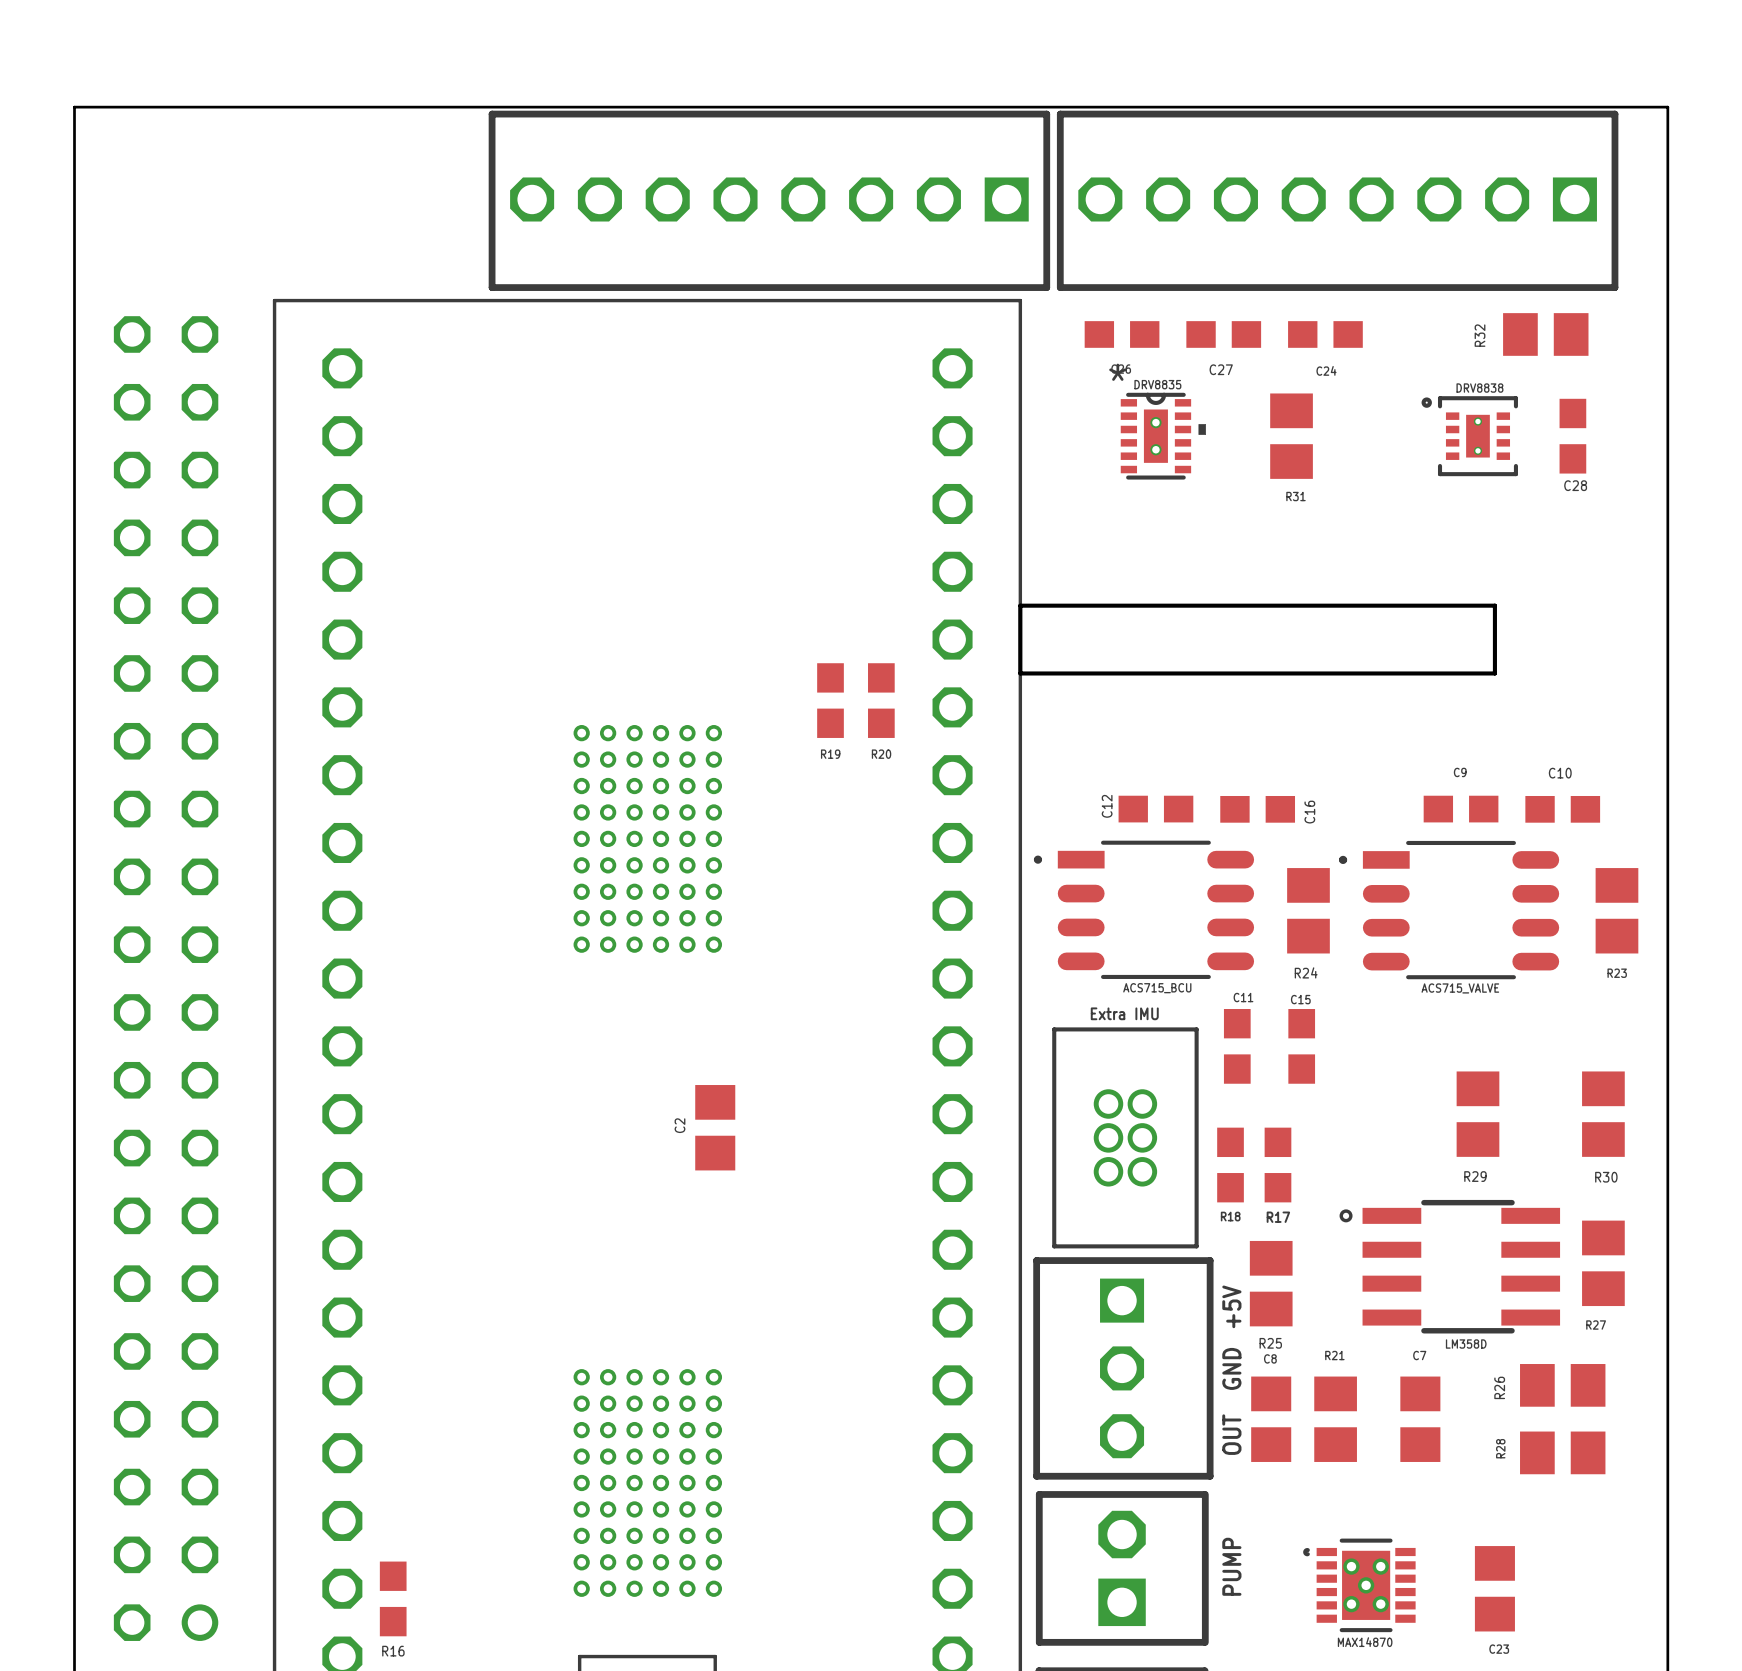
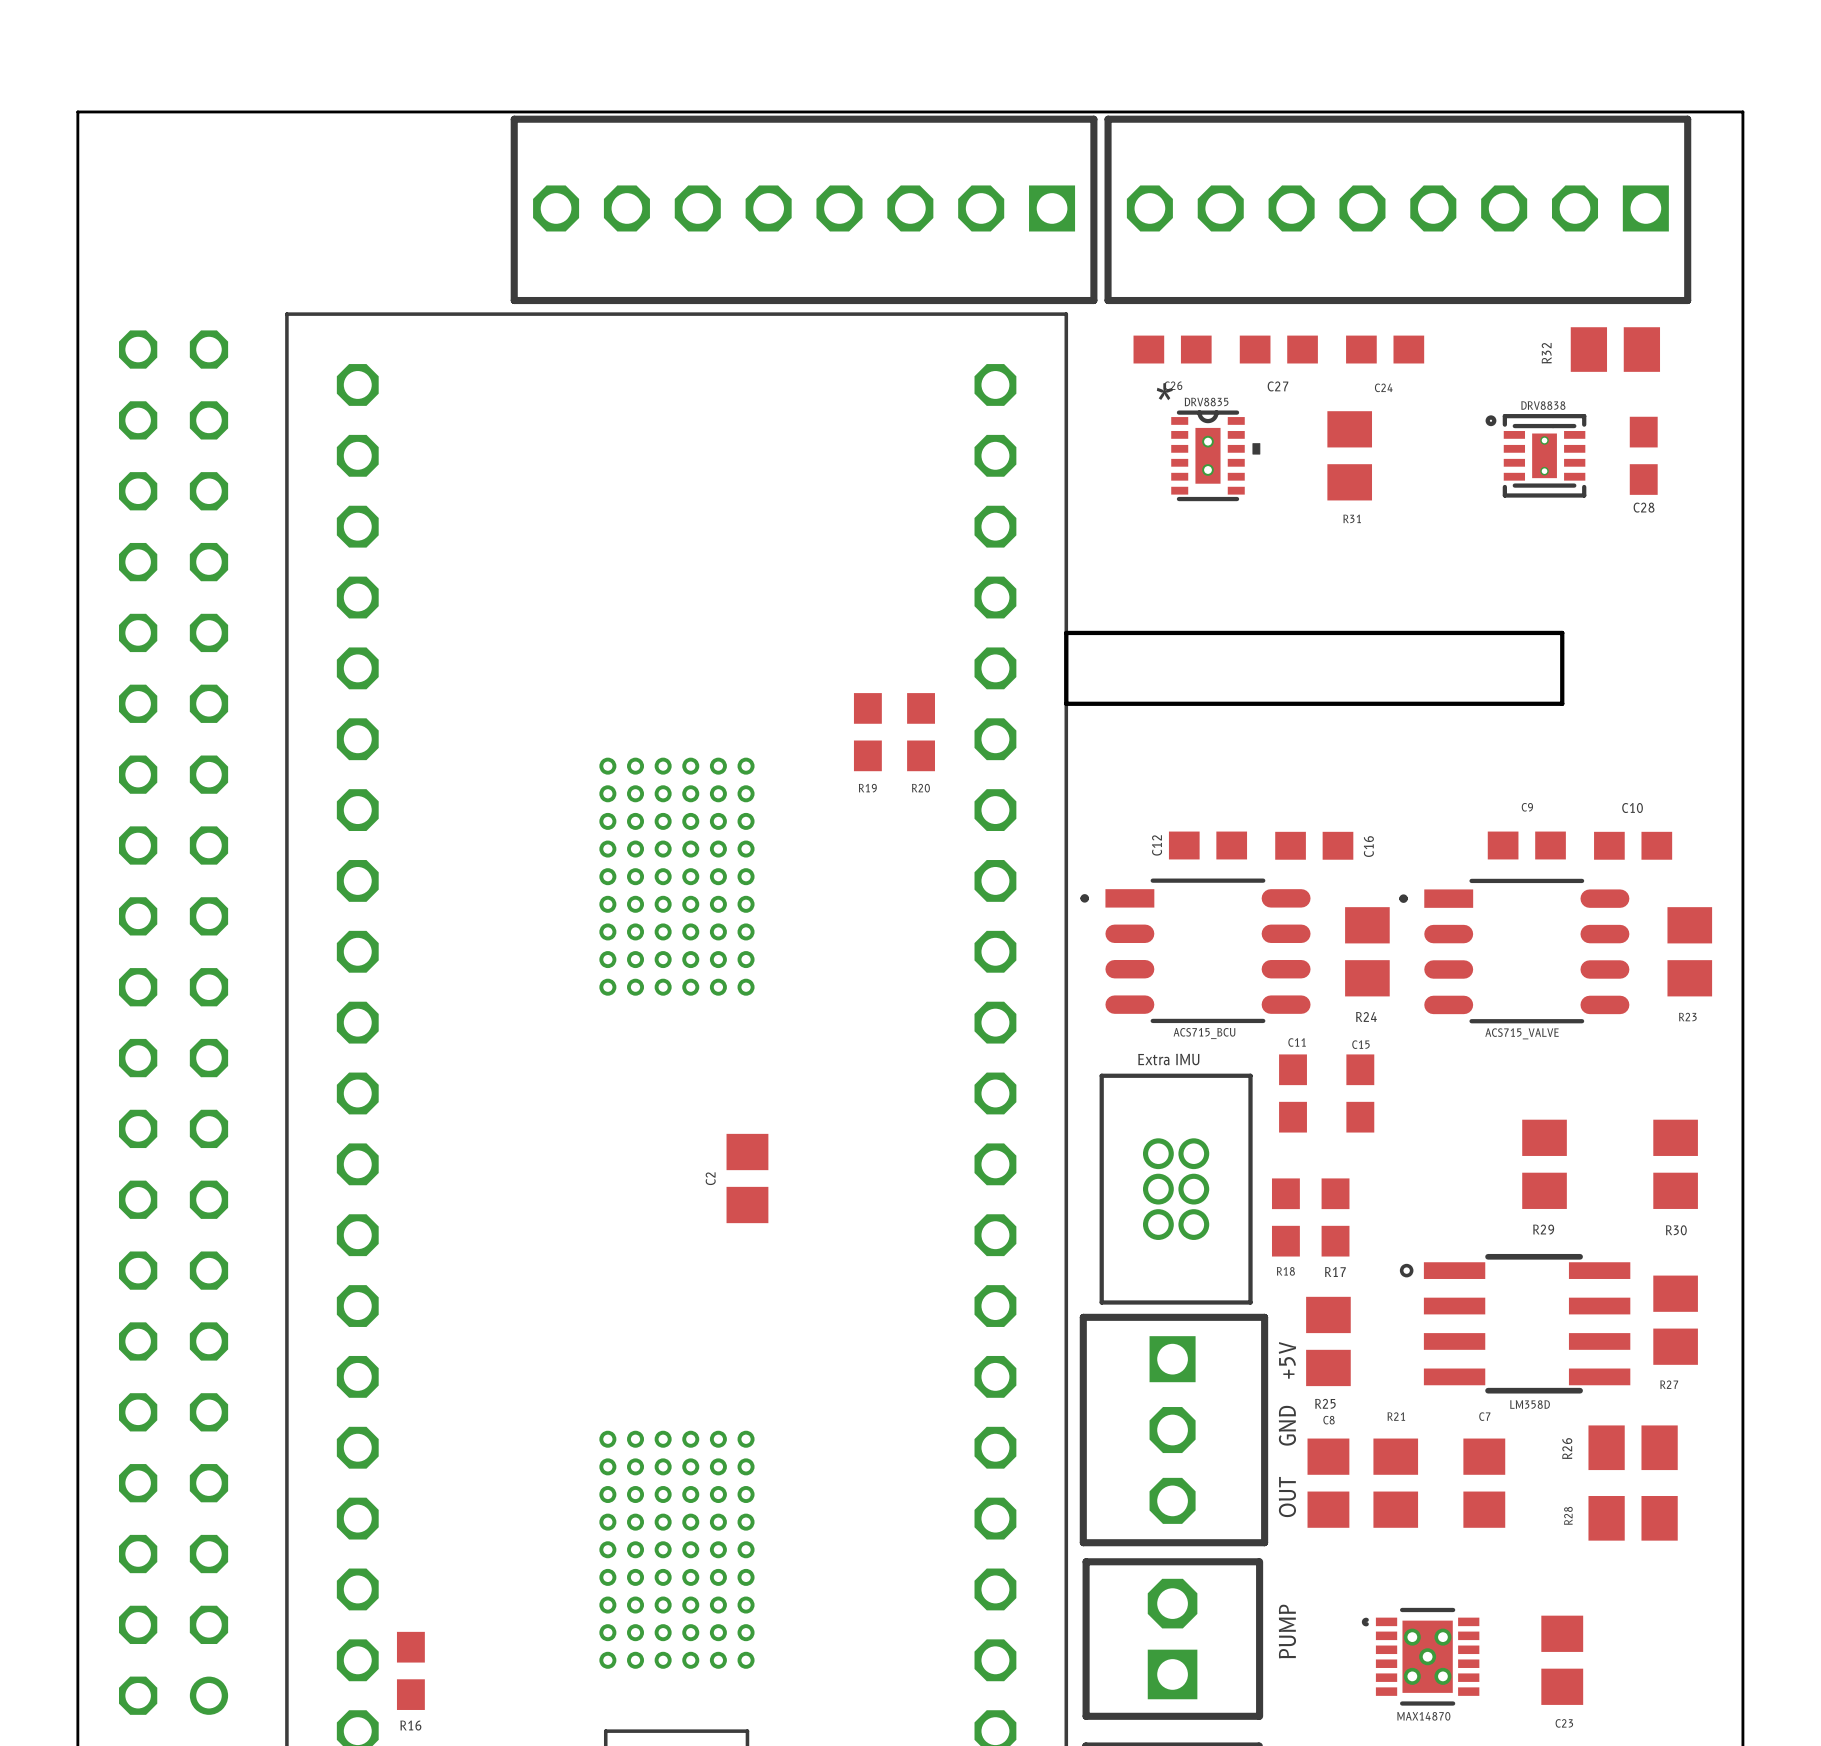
DRV8838 footprint: [1421, 396, 1518, 477] -> [1485, 414, 1587, 498]

